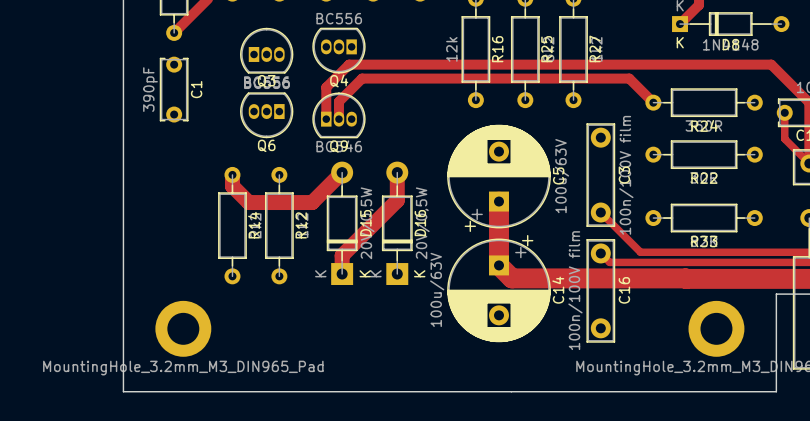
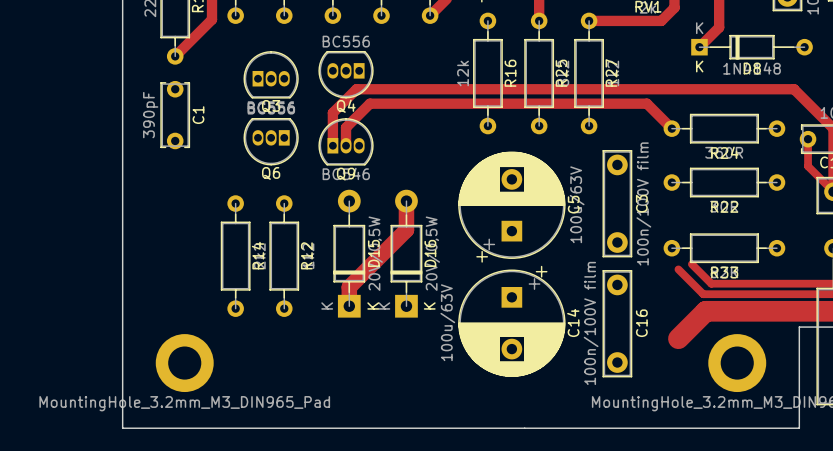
track: (342, 172) (312, 202) (248, 202) (232, 186) (232, 174) -> none
track: (499, 201) (499, 265) (511, 278) (686, 278) -> (678, 338) (705, 311)
track: (600, 212) (640, 252) (691, 252) -> (691, 264) (711, 283)
track: (600, 253) (609, 262) (683, 262) -> (678, 269) (703, 294)

